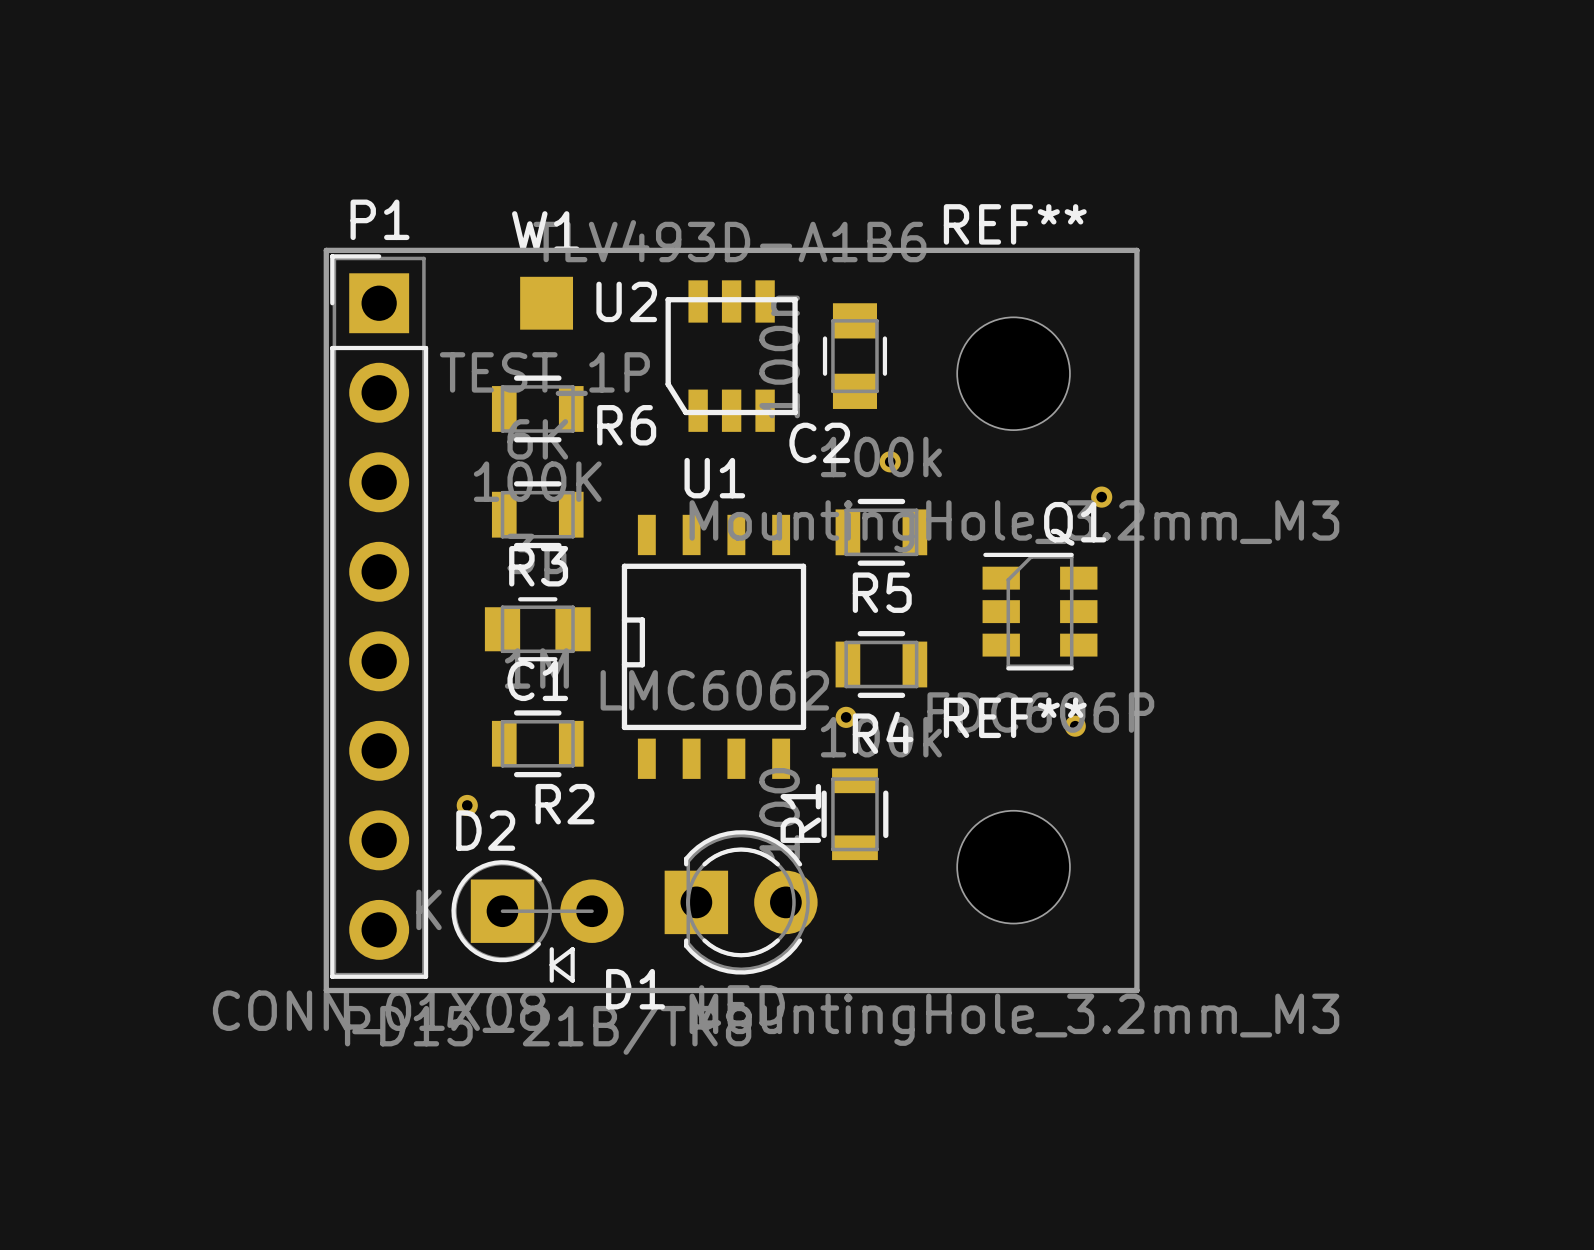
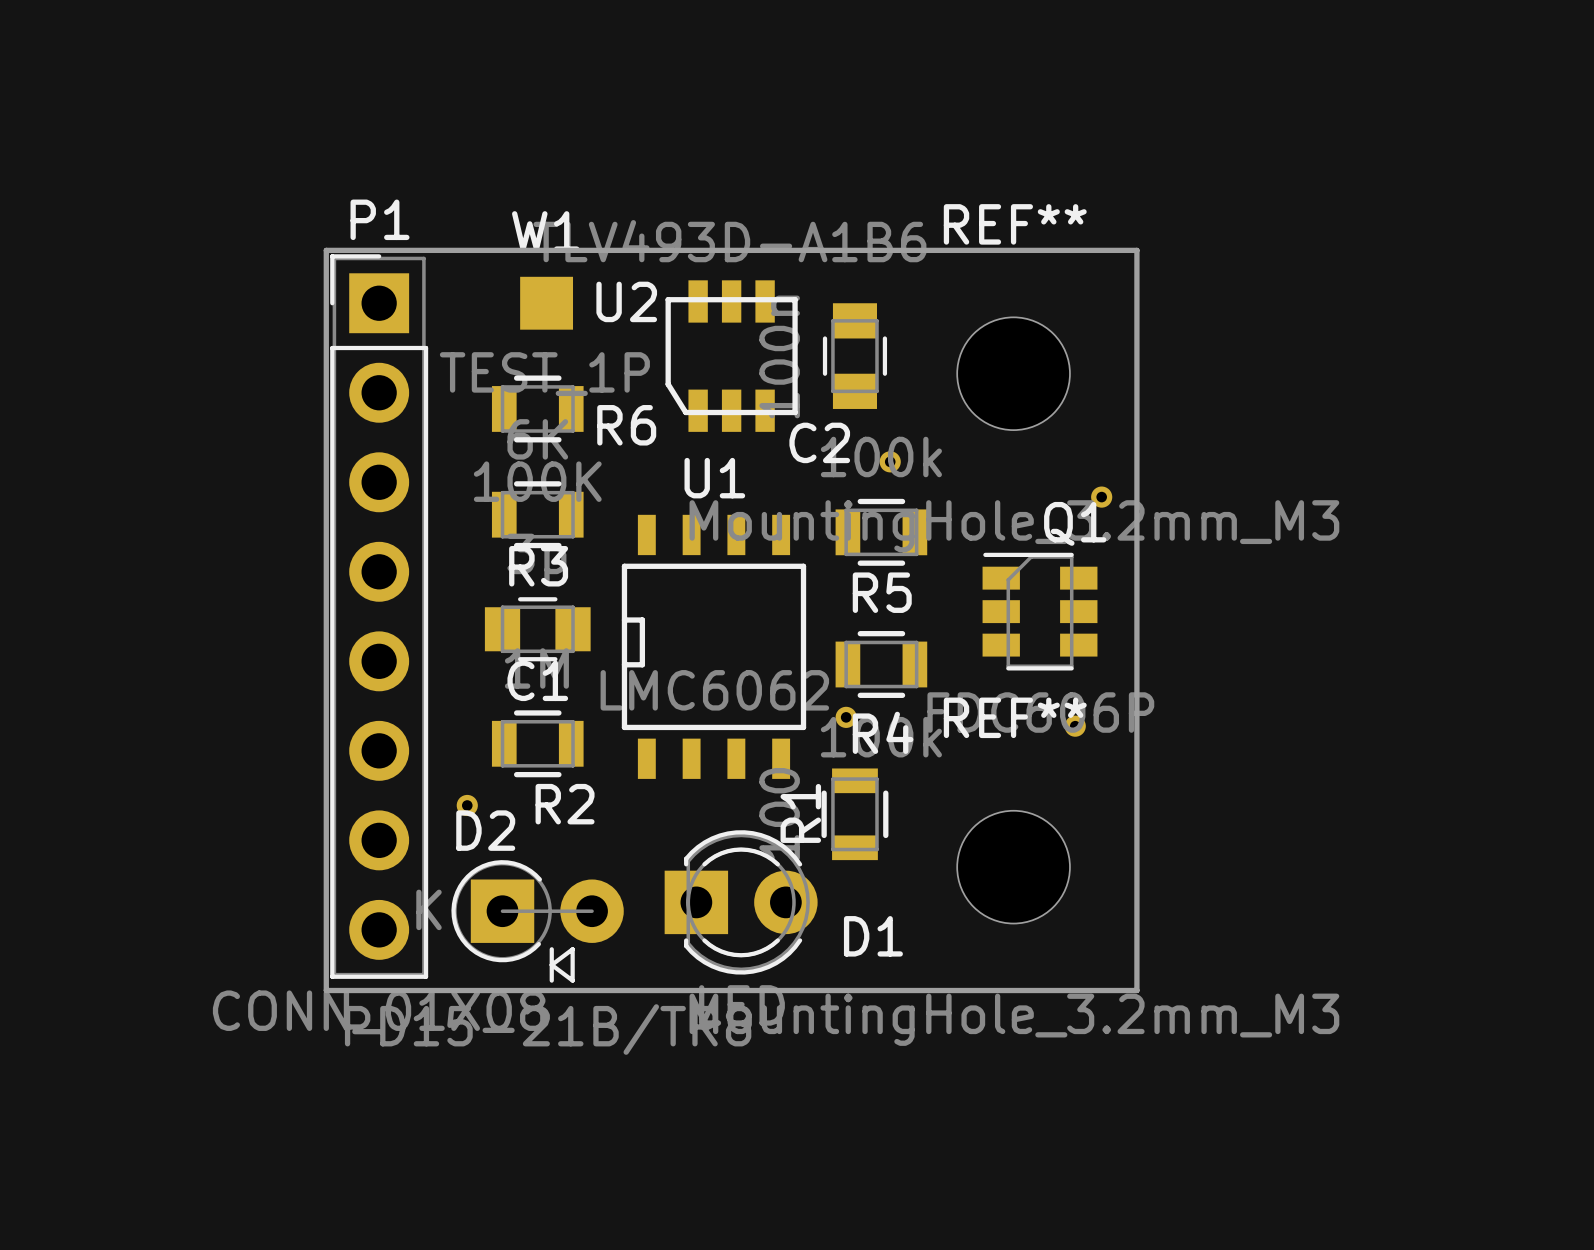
D1 name position: D1 (635, 989) -> D1 (873, 936)

